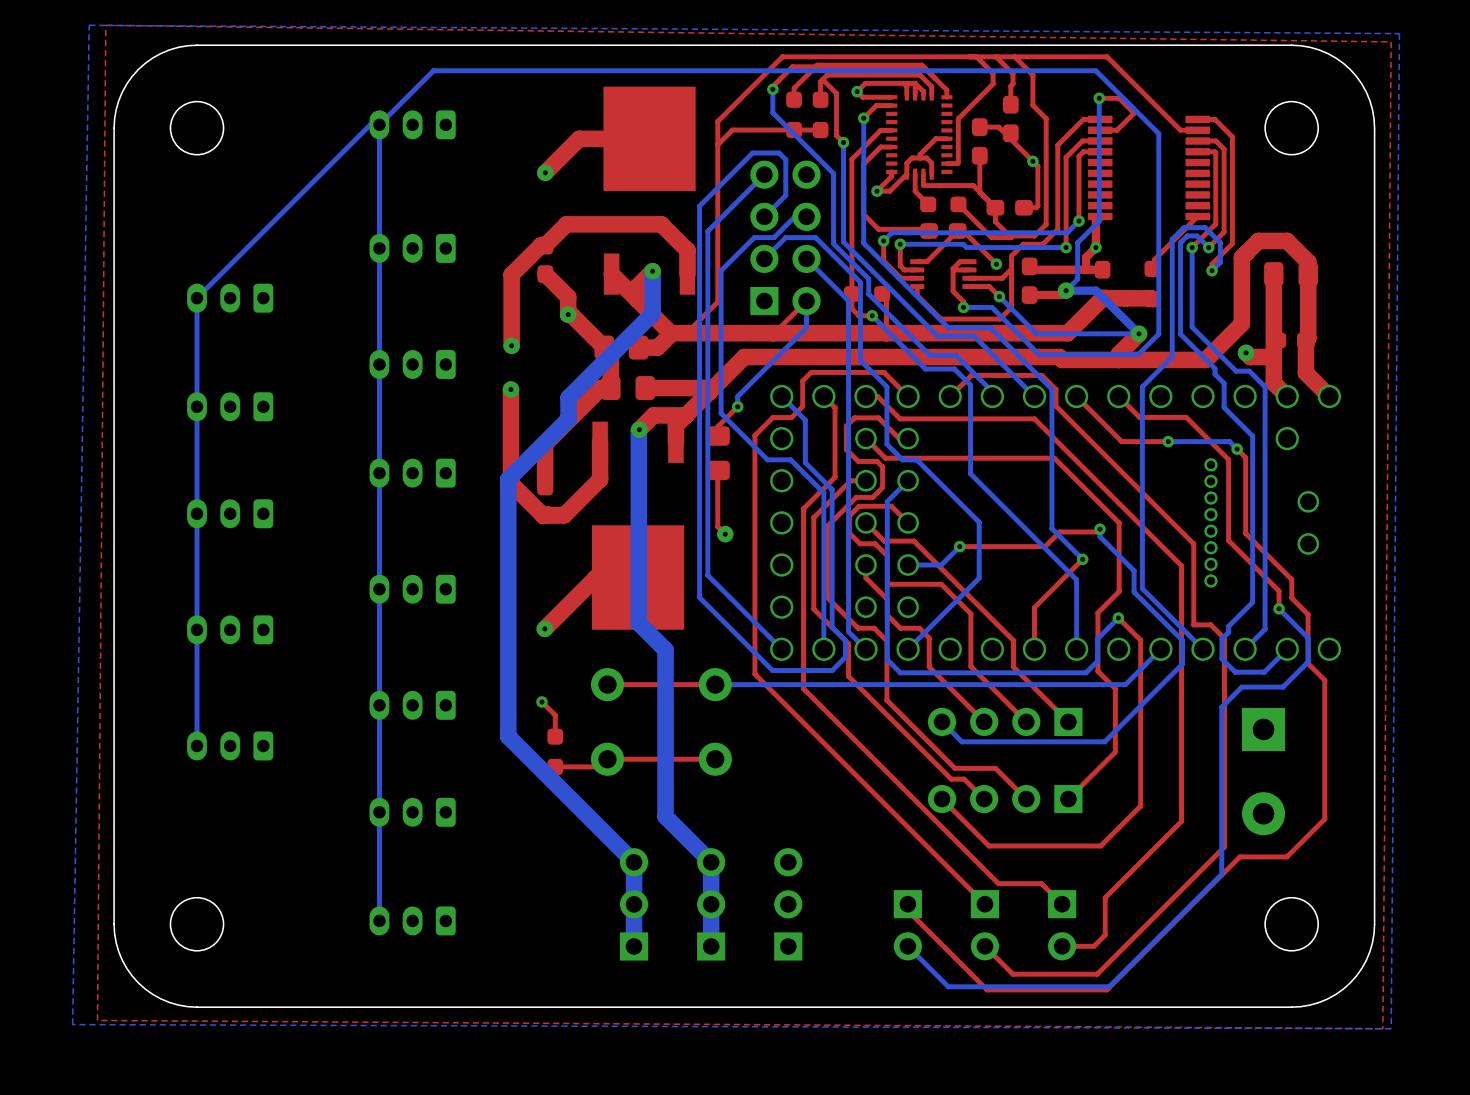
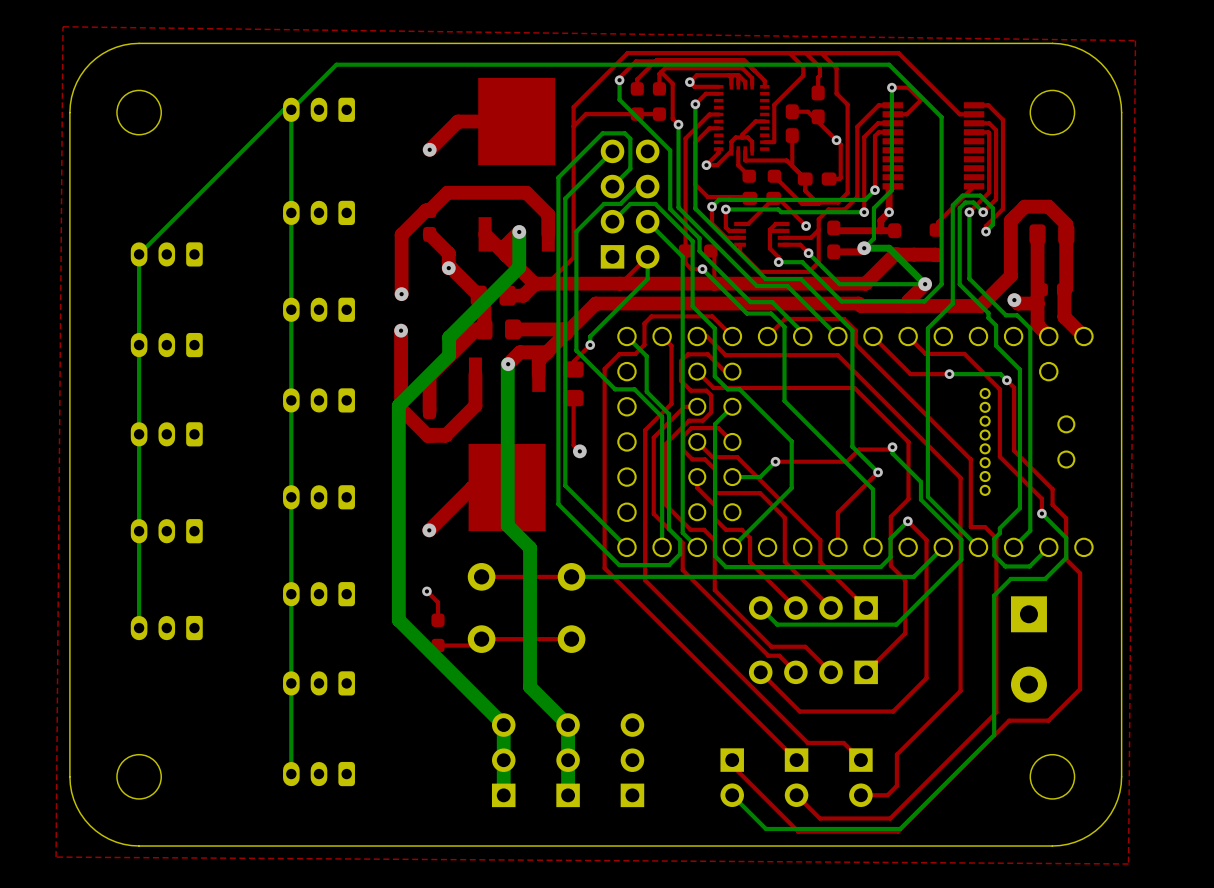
bottom zone outline: (89, 25) (72, 1024) (1391, 1028) (1399, 33) (89, 25) -> none

